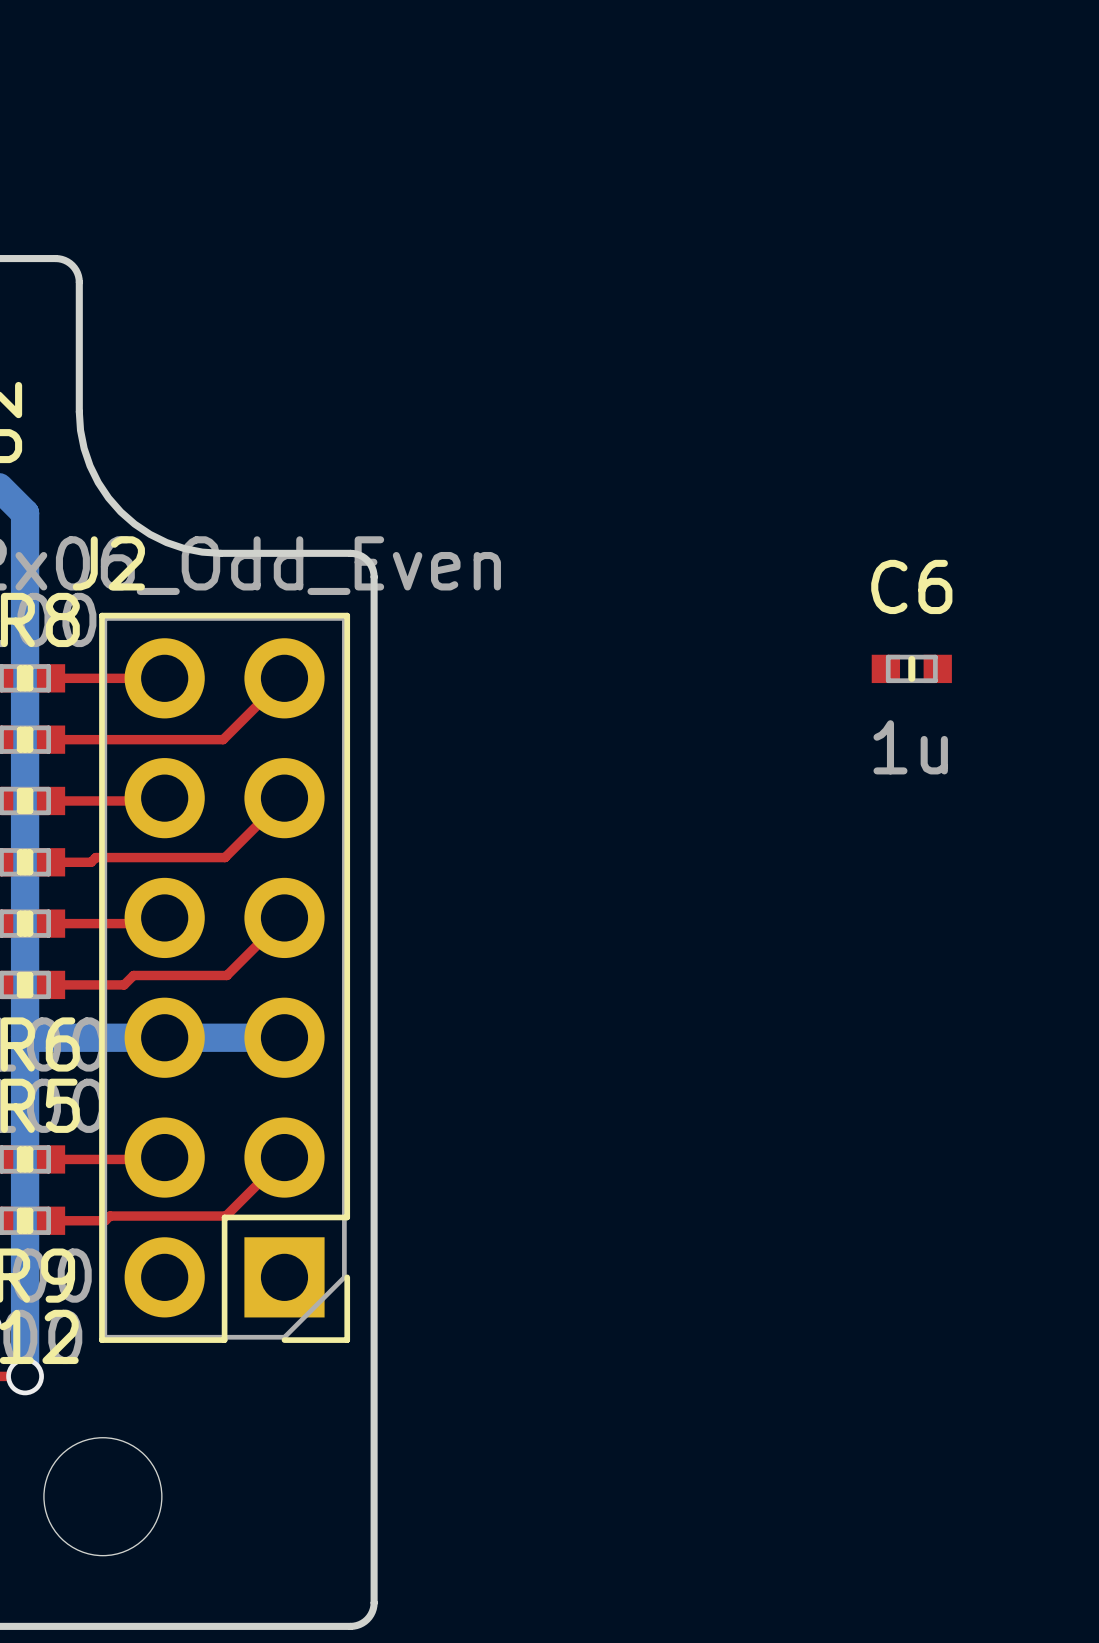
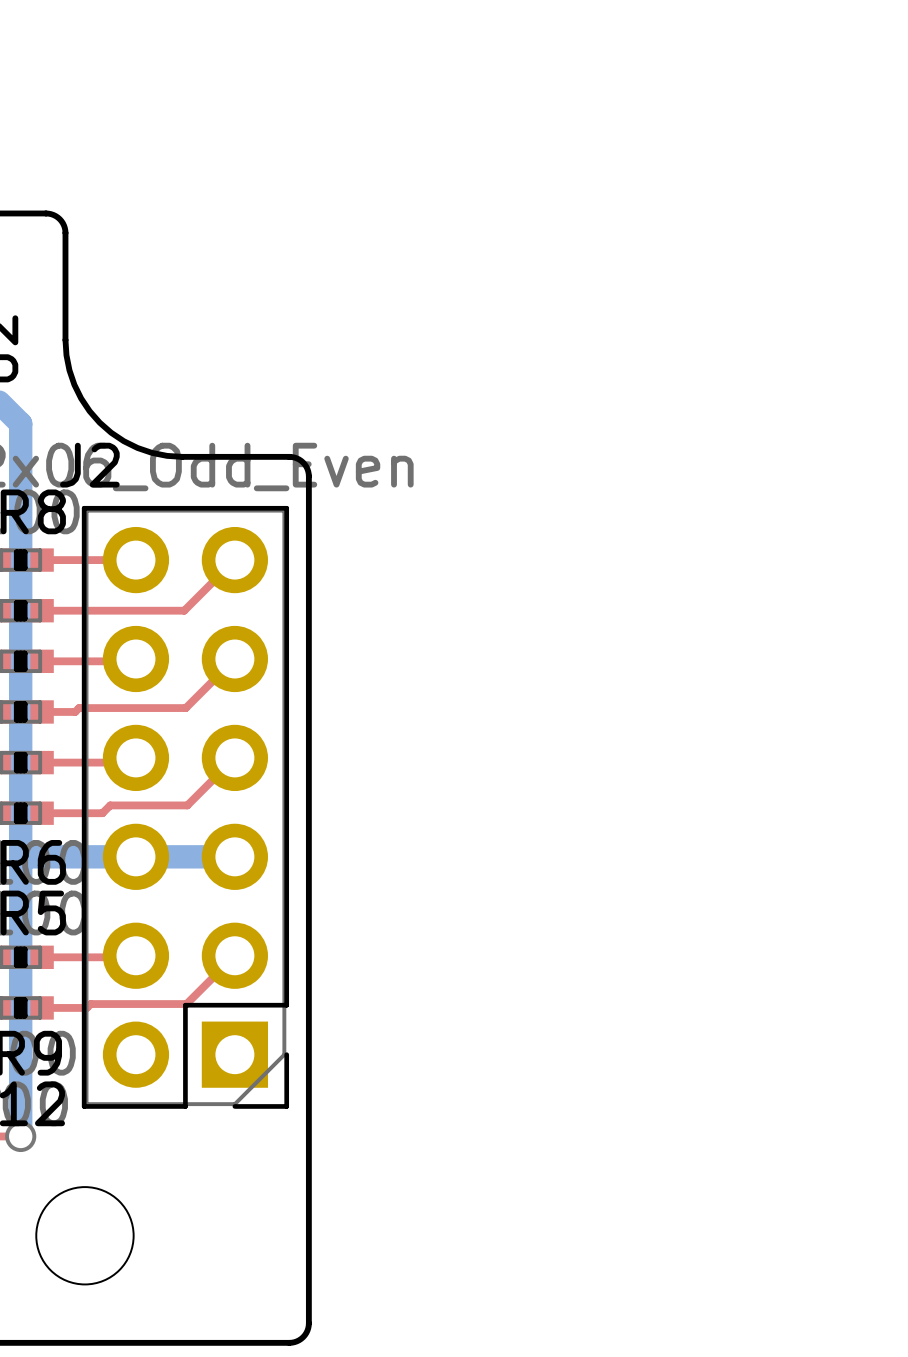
C6: 1u (911, 668) -> none

